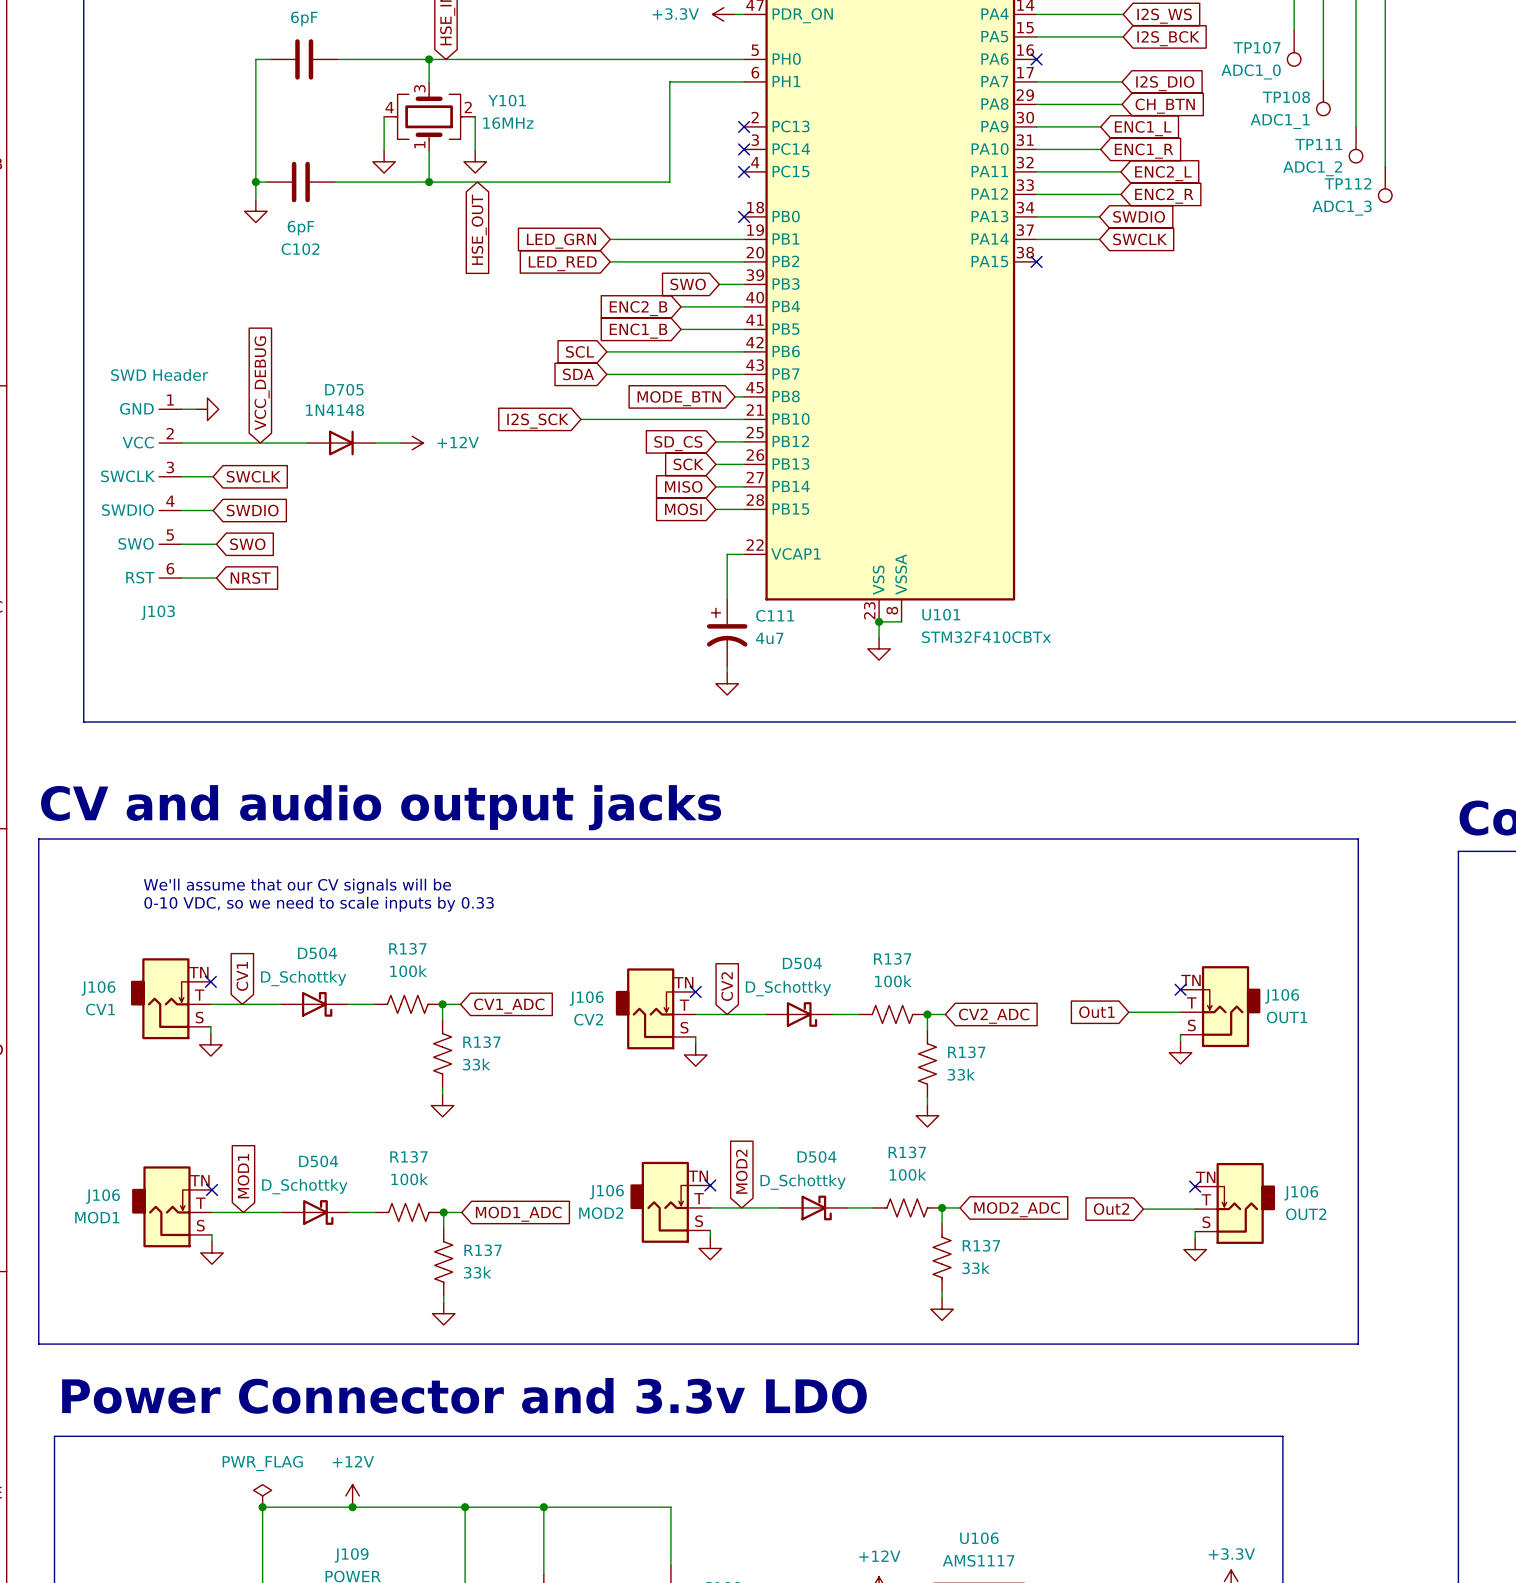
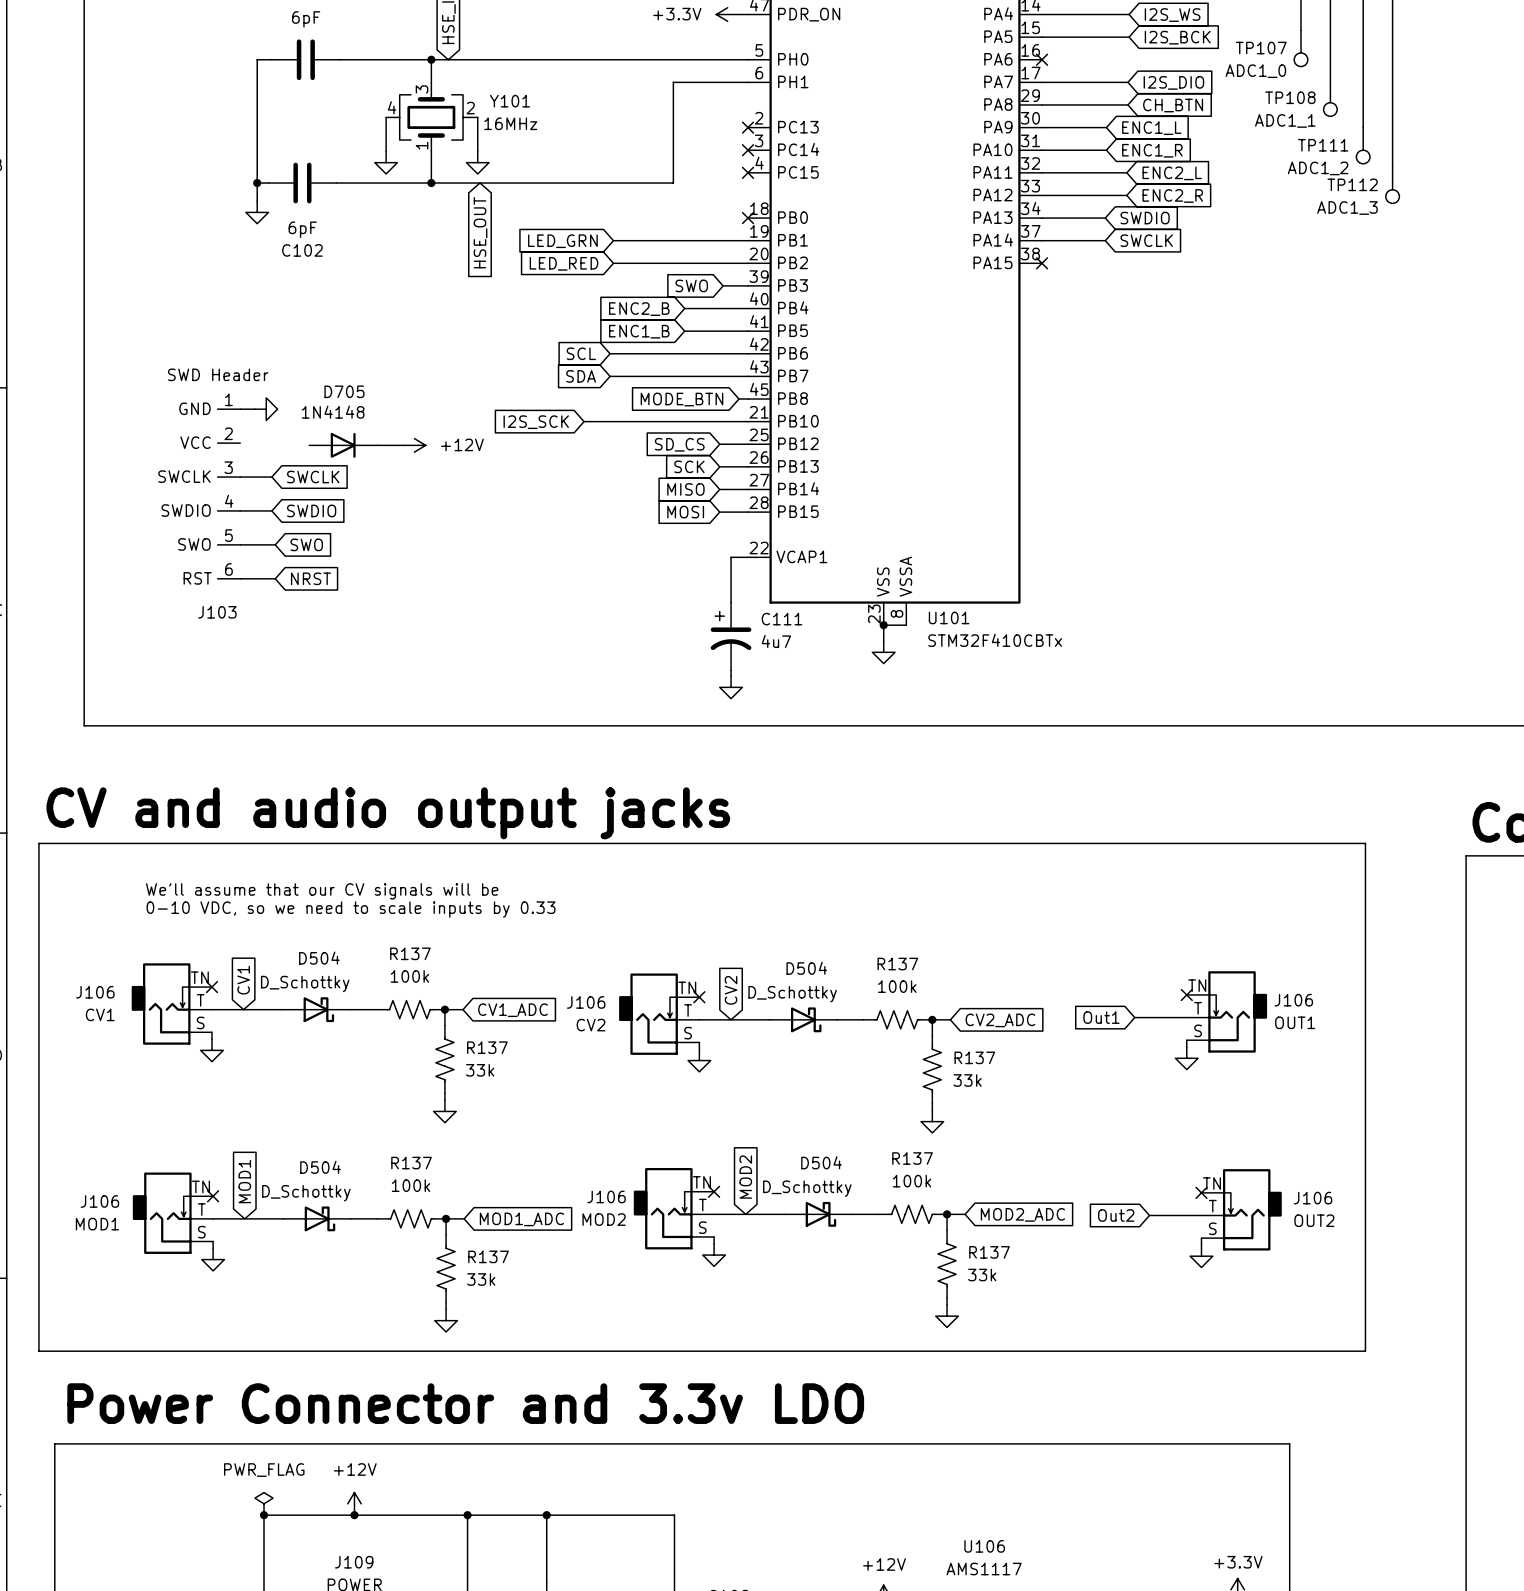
global label: VCC_DEBUG (262, 383) -> none
wire: (181, 409) (196, 409) -> (240, 409) (254, 409)
power symbol position: (207, 409) -> (266, 409)
wire: (181, 443) (307, 443) -> none
wire: (181, 476) (213, 476) -> (240, 477) (271, 477)
global label position: SWCLK (253, 476) -> SWCLK (313, 477)
J103 position: (170, 493) -> (228, 494)
wire: (181, 510) (213, 510) -> (240, 510) (271, 510)
global label position: SWDIO (252, 510) -> SWDIO (311, 510)
wire: (181, 544) (216, 544) -> (240, 544) (275, 544)
global label position: SWO (247, 544) -> SWO (306, 544)
wire: (181, 578) (216, 578) -> (240, 578) (275, 578)
global label position: NRST (250, 578) -> NRST (311, 578)

